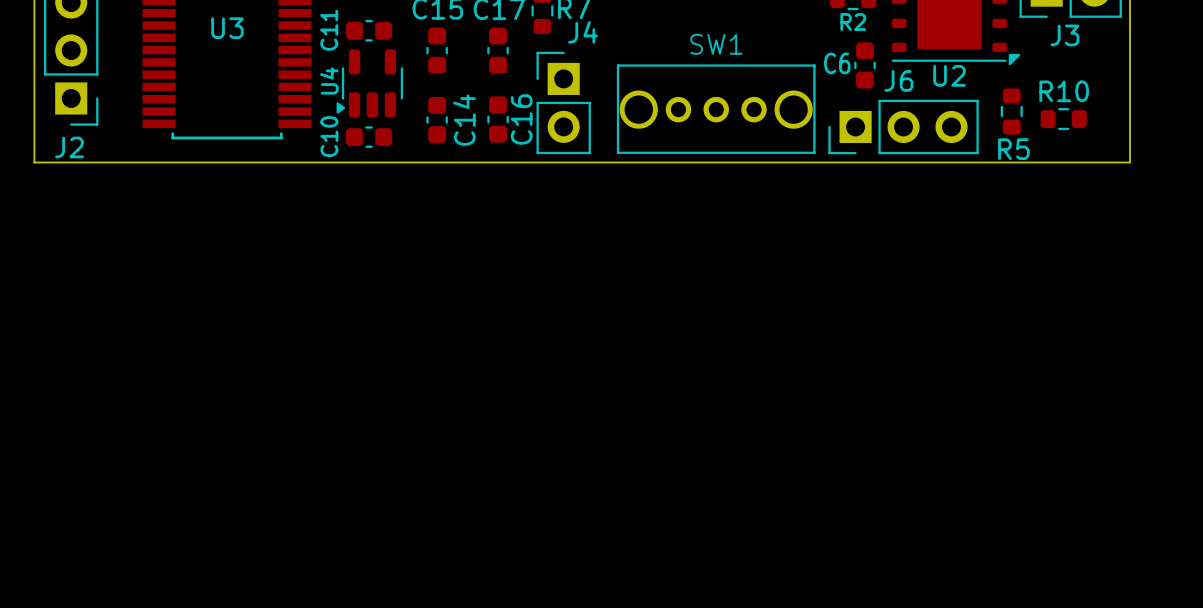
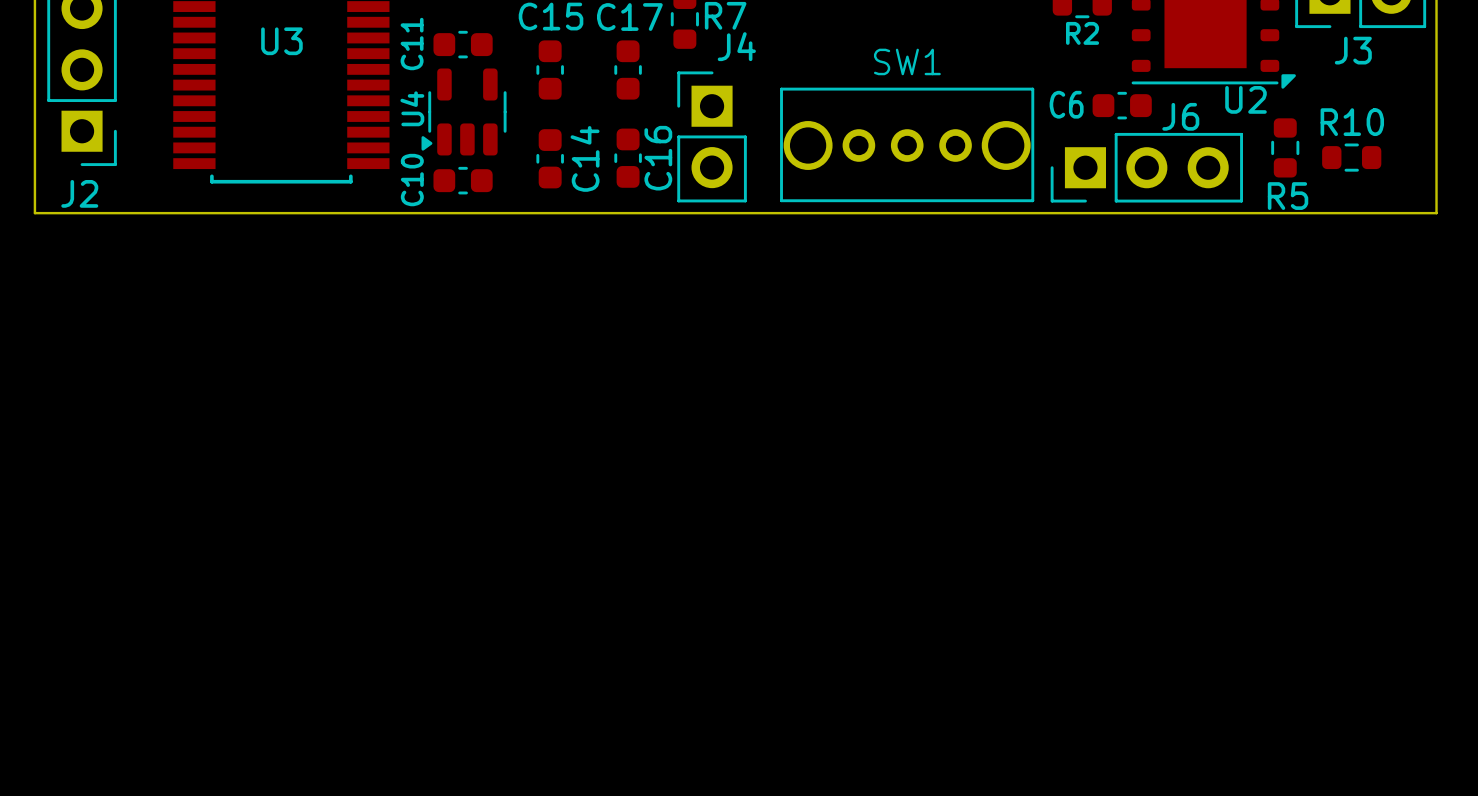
C6 rotation: 0° (865, 65) -> 90° clockwise (1122, 105)
U2 name position: U2 (949, 75) -> U2 (1245, 99)
J6 name position: J6 (898, 80) -> J6 (1180, 116)

